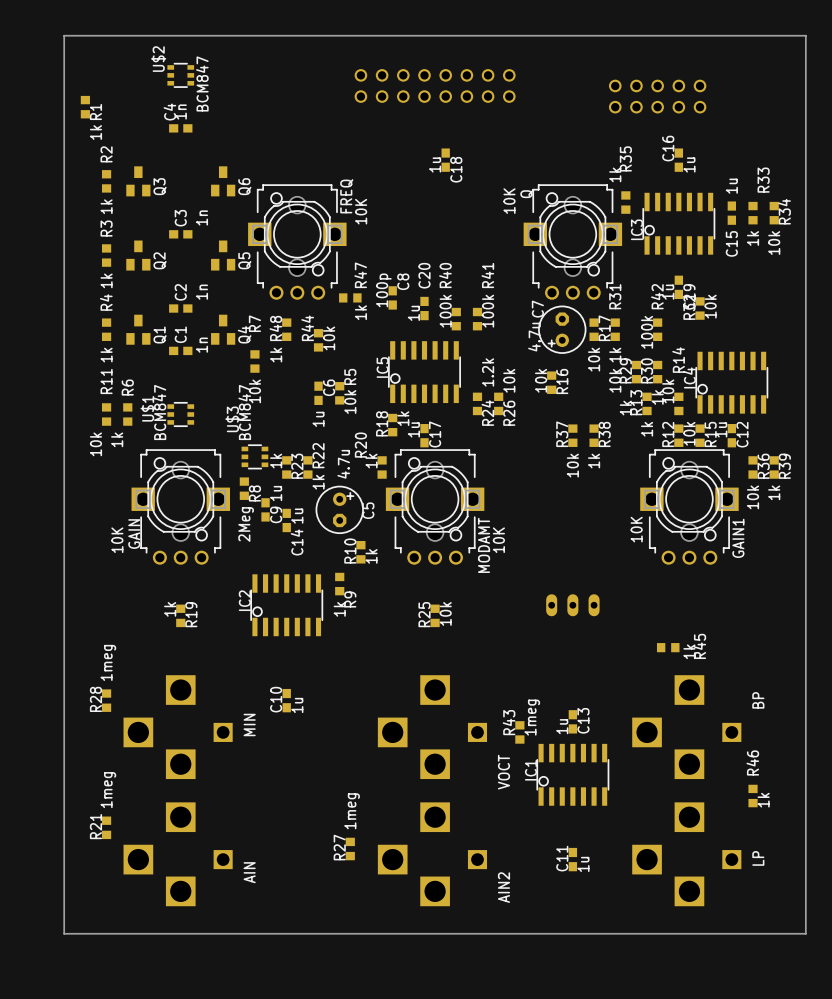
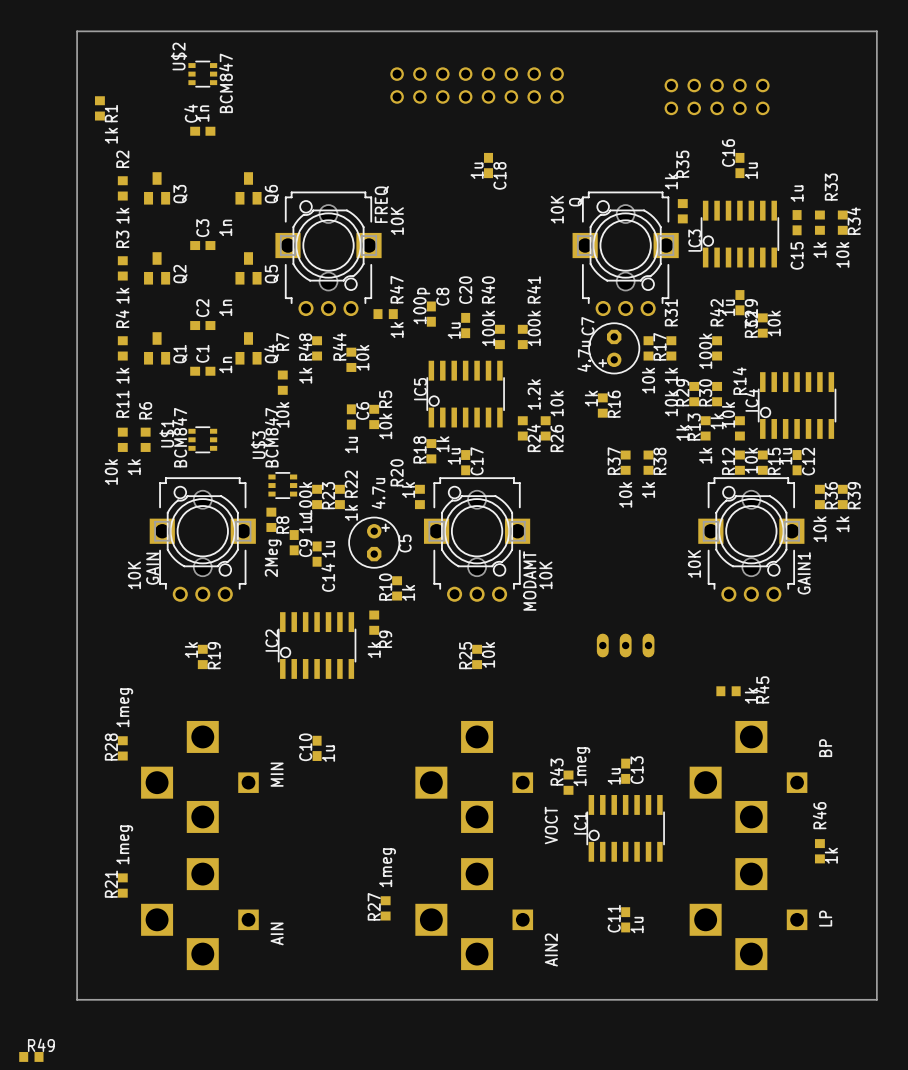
R16 value: 10k (541, 380) -> 1k (591, 398)
R23 value: 1k (276, 461) -> 100k (305, 499)
R49: none -> (31, 1056)

